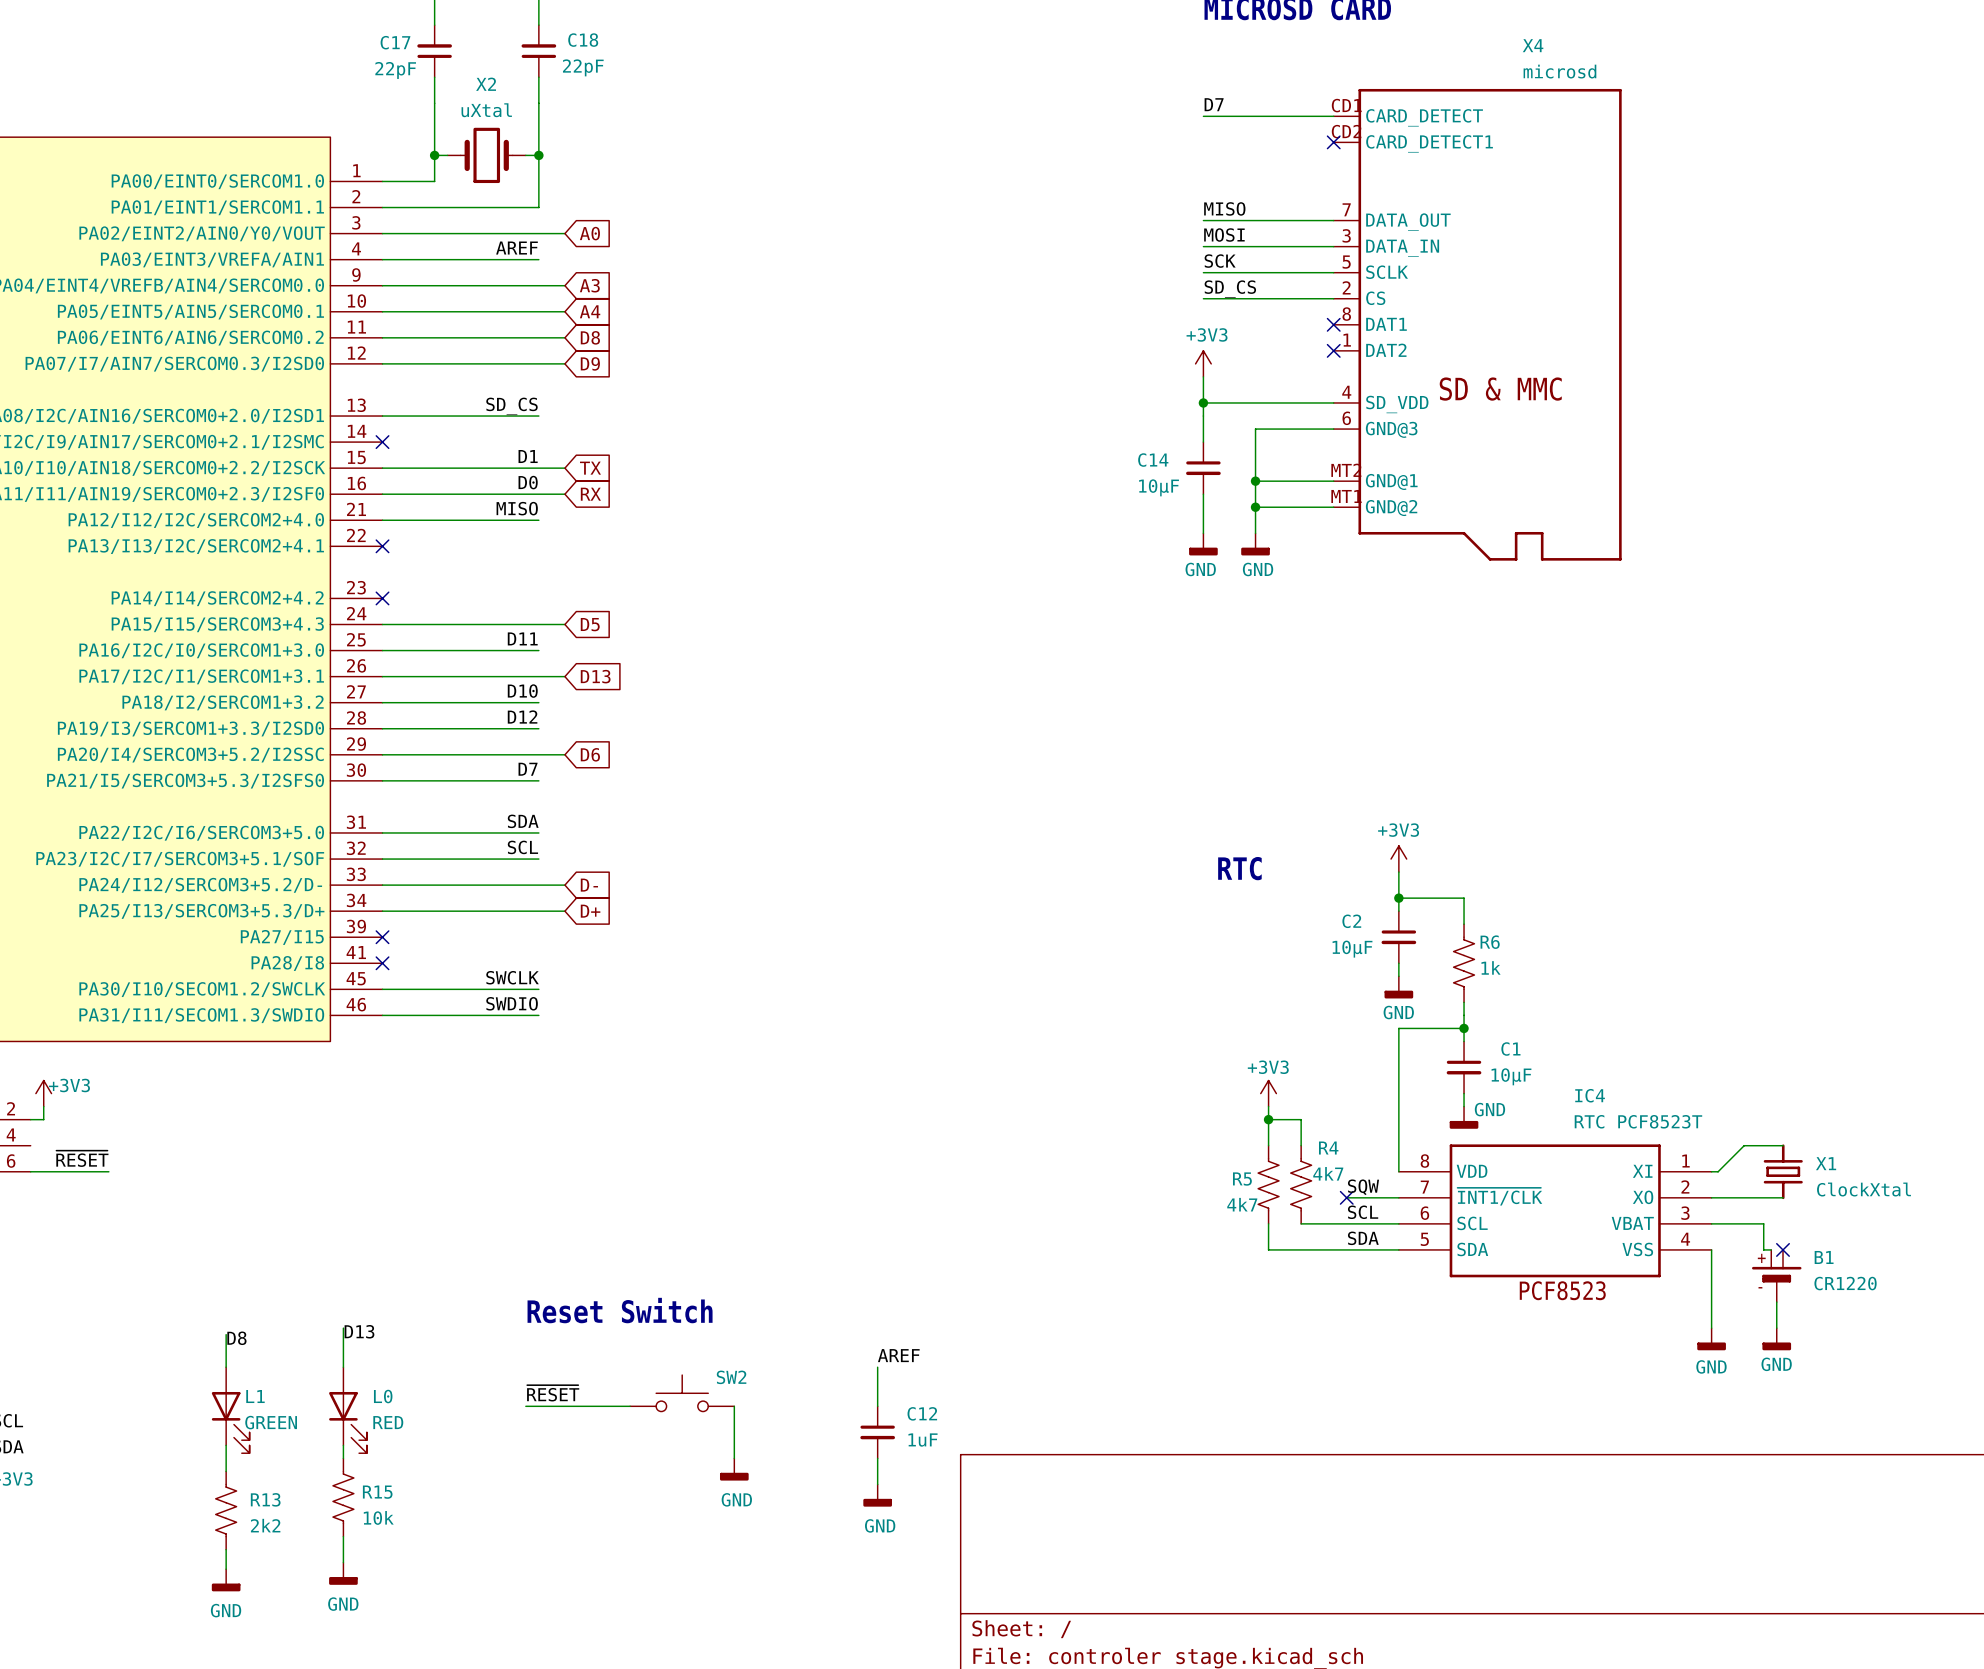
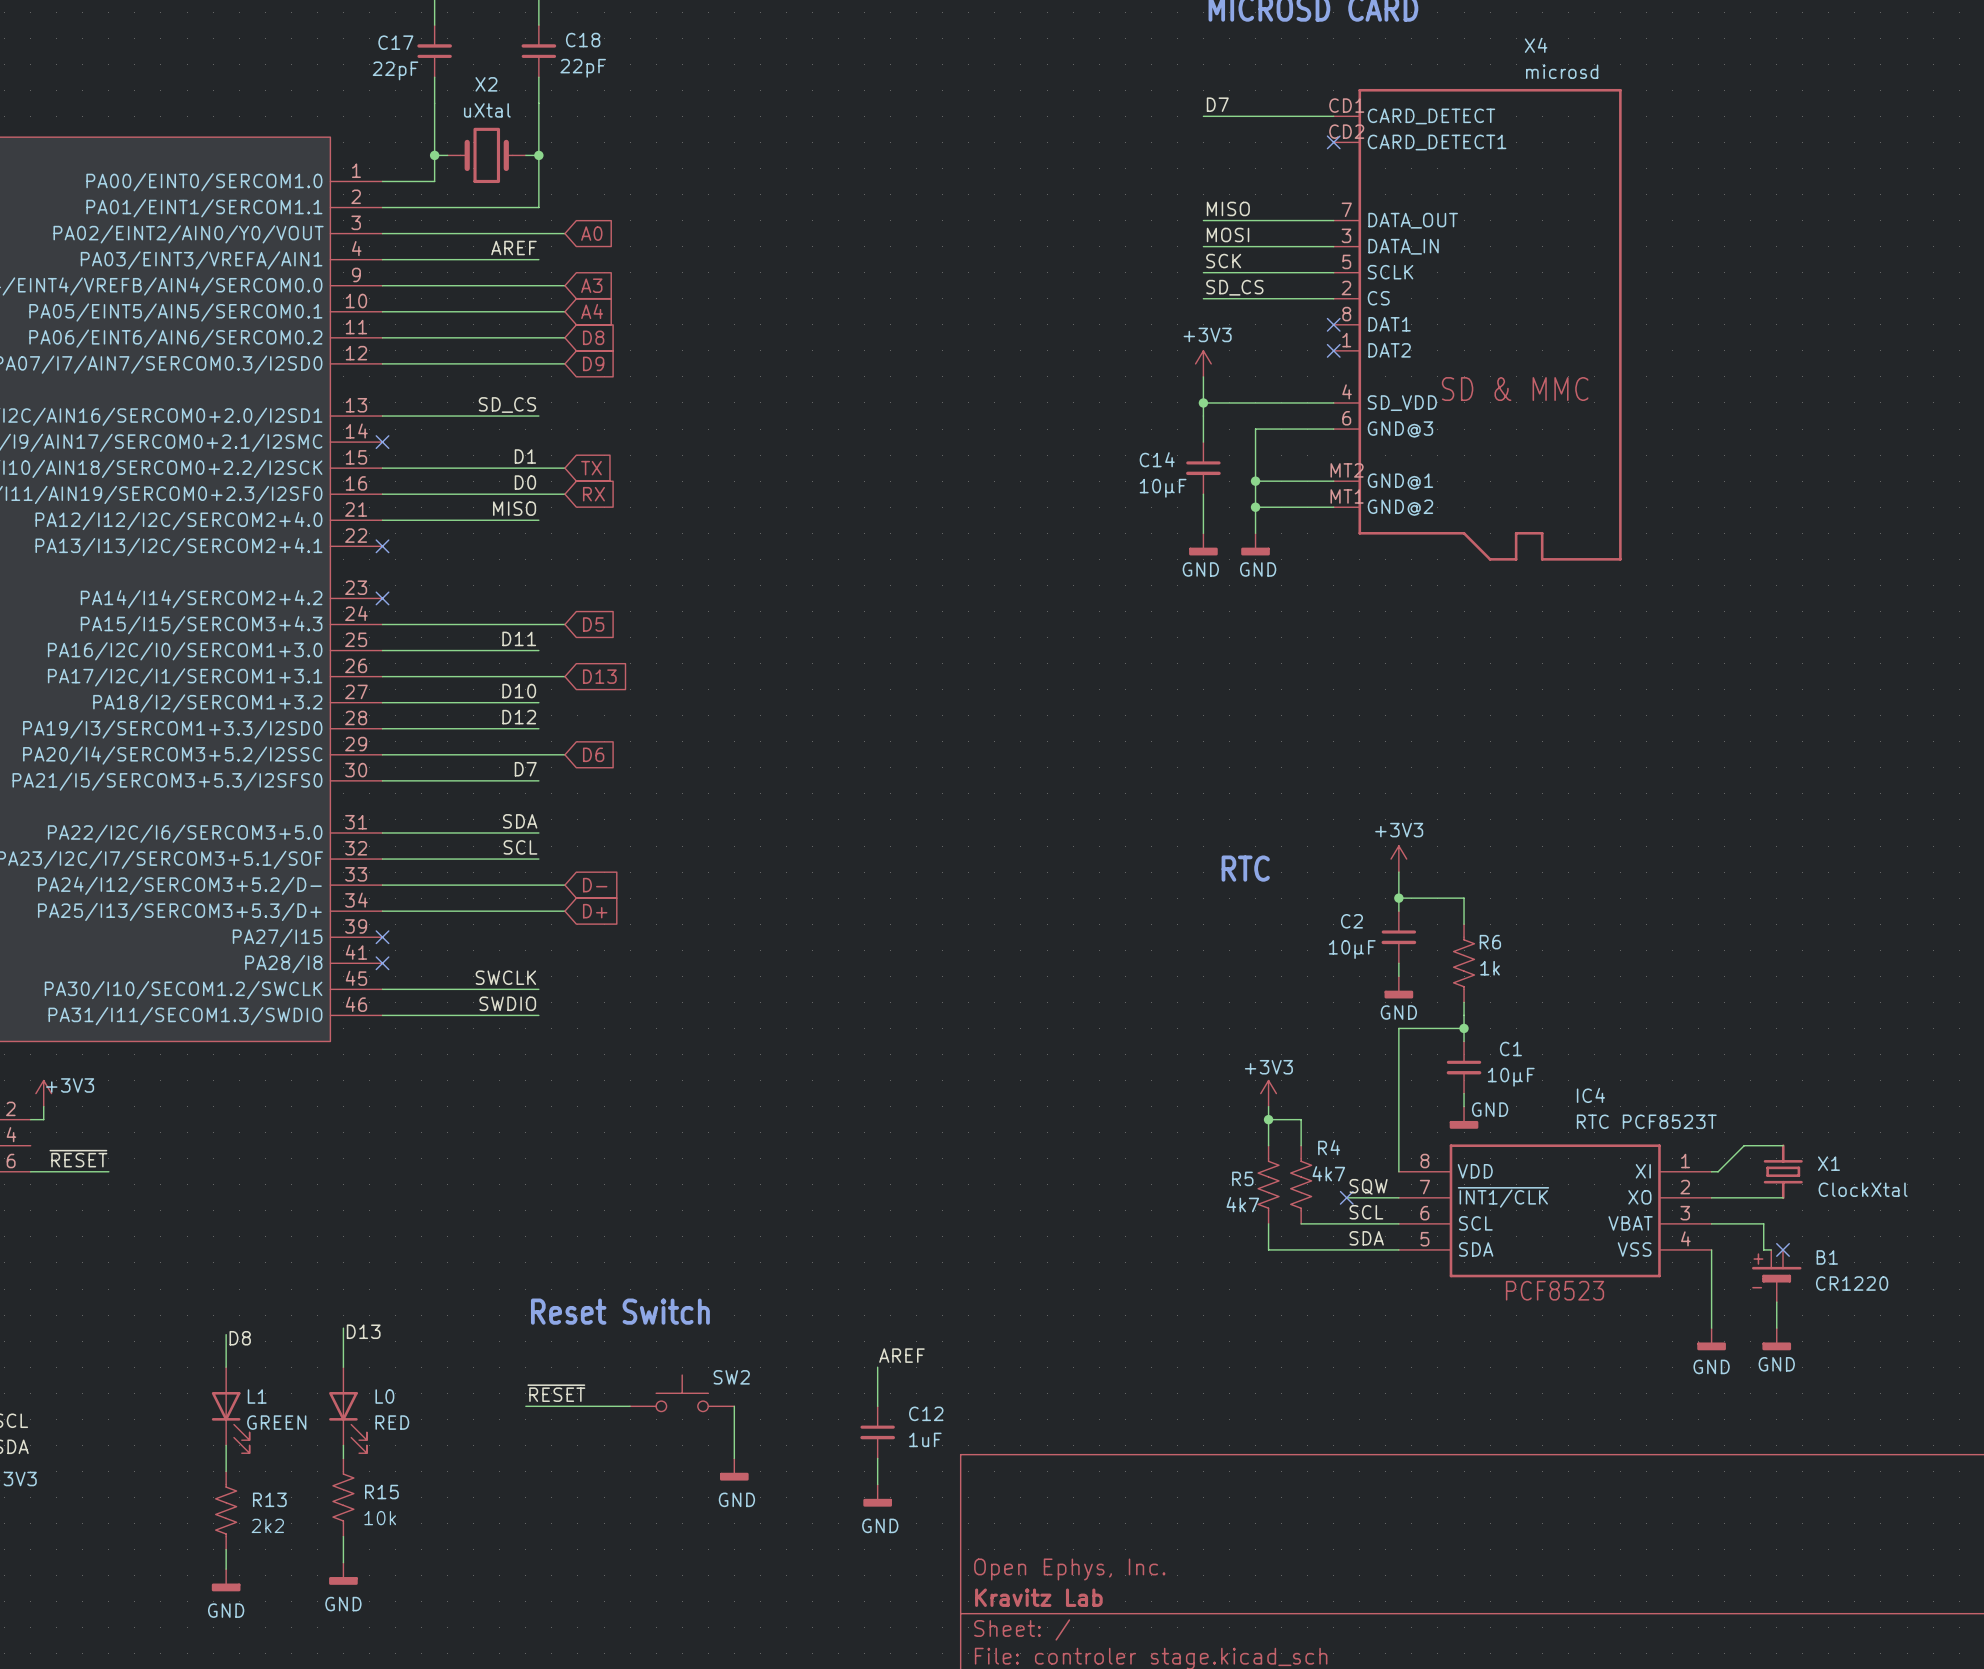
title block: none -> Open Ephys, Inc. (1069, 1569)
title block: none -> Kravitz Lab (1038, 1597)

